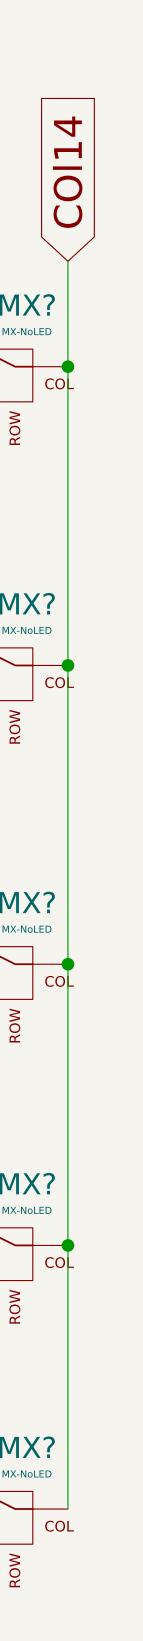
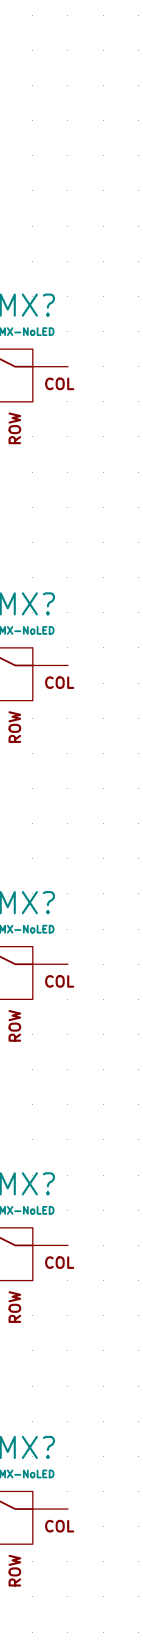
global label: COl14 (67, 172) -> none
wire: (67, 261) (67, 1509) -> none
junction: (67, 366) -> none
junction: (67, 665) -> none
junction: (67, 964) -> none
junction: (67, 1245) -> none

